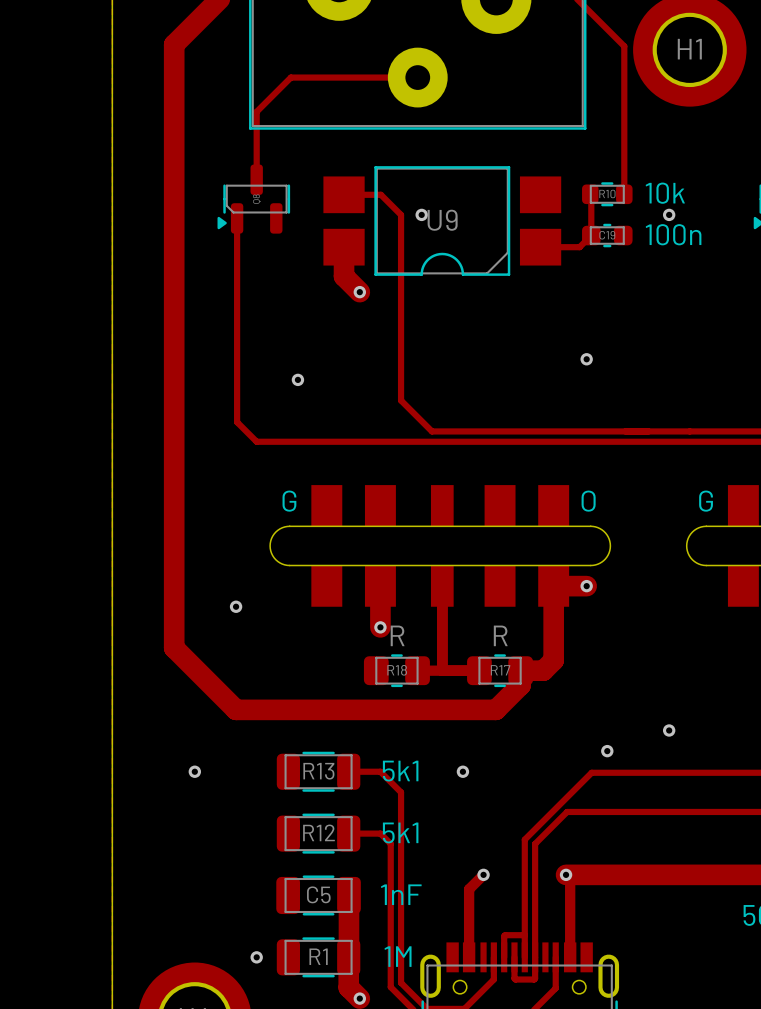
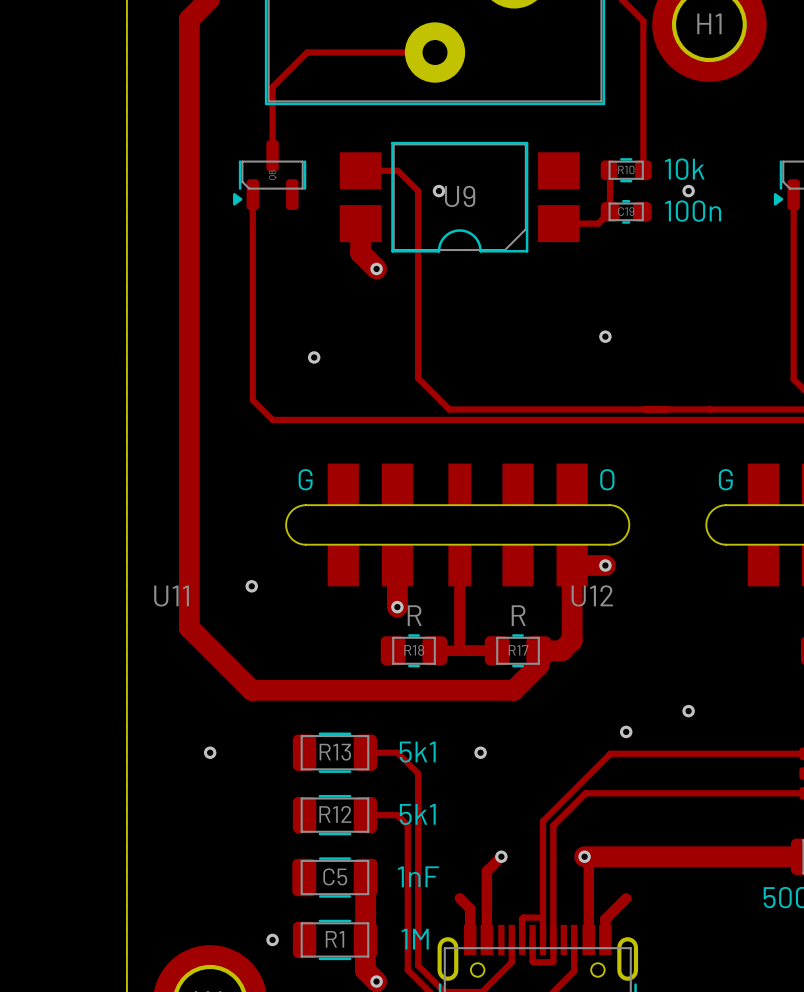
U11 name: none -> U11 (171, 596)
U12 name: none -> U12 (592, 595)
track: none -> (459, 898) (470, 908) (470, 939)
track: none -> (626, 898) (605, 919) (605, 939)

